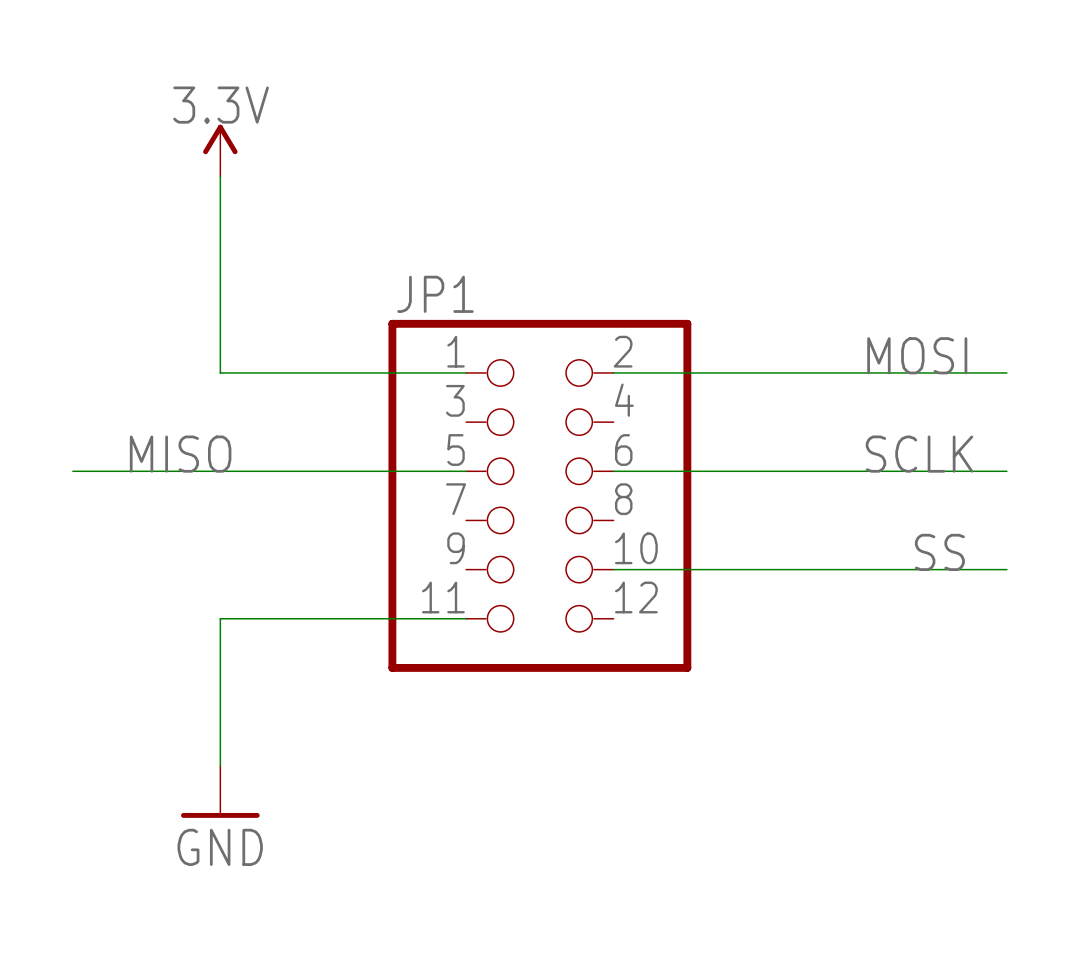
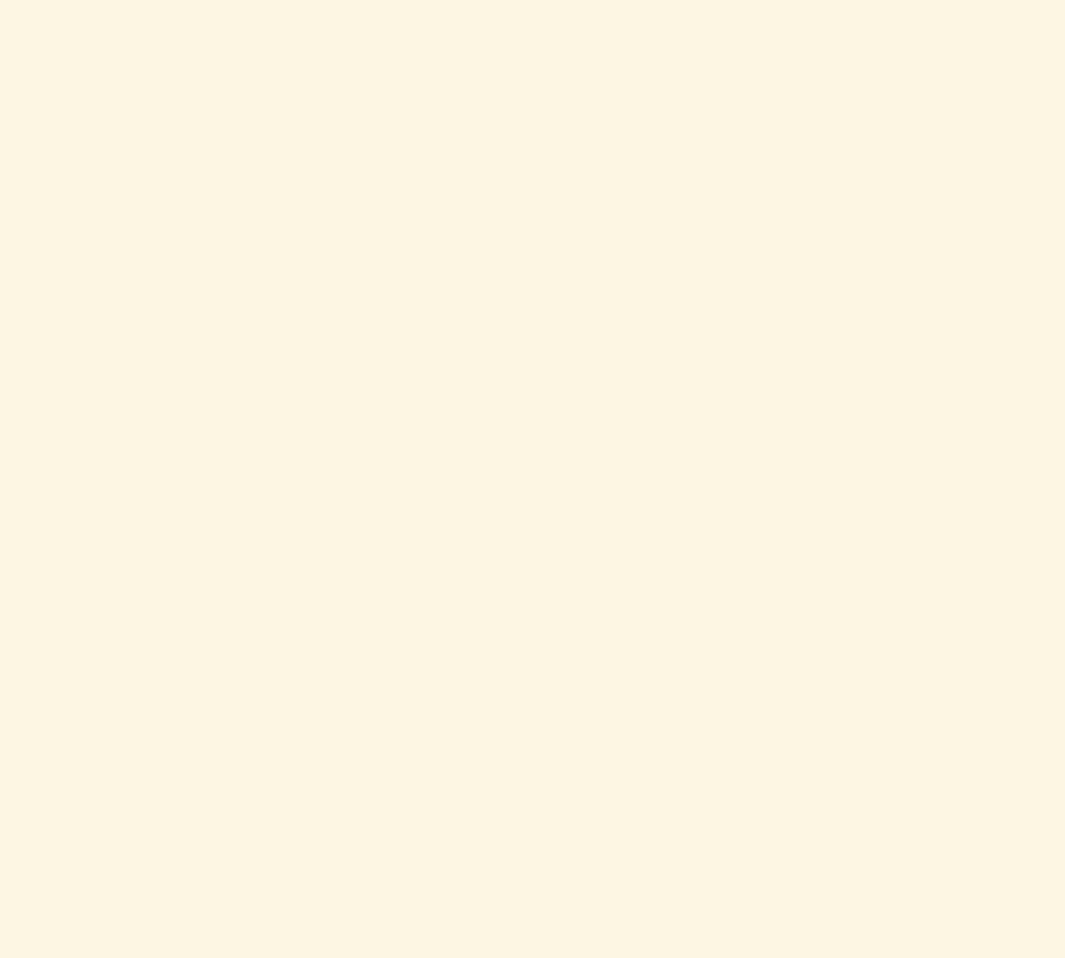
power symbol: 3.3V (220, 150) -> none
wire: (220, 176) (220, 372) (466, 372) -> none
label: MOSI (917, 355) -> none
wire: (613, 372) (1006, 372) -> none
label: MISO (180, 454) -> none
label: SCLK (919, 454) -> none
wire: (72, 471) (466, 471) -> none
wire: (613, 471) (1006, 471) -> none
JP1: (539, 495) -> none
label: SS (939, 552) -> none
wire: (613, 569) (1006, 569) -> none
wire: (466, 618) (220, 618) (220, 766) -> none
power symbol: GND (220, 792) -> none

